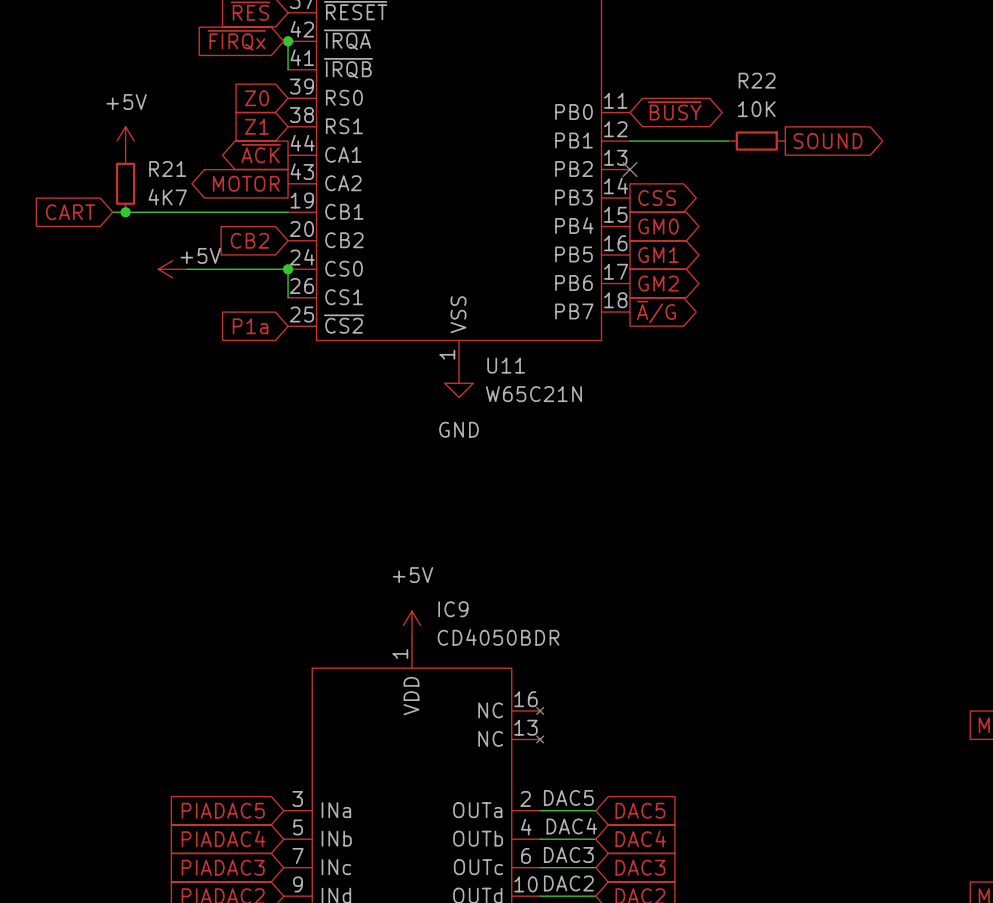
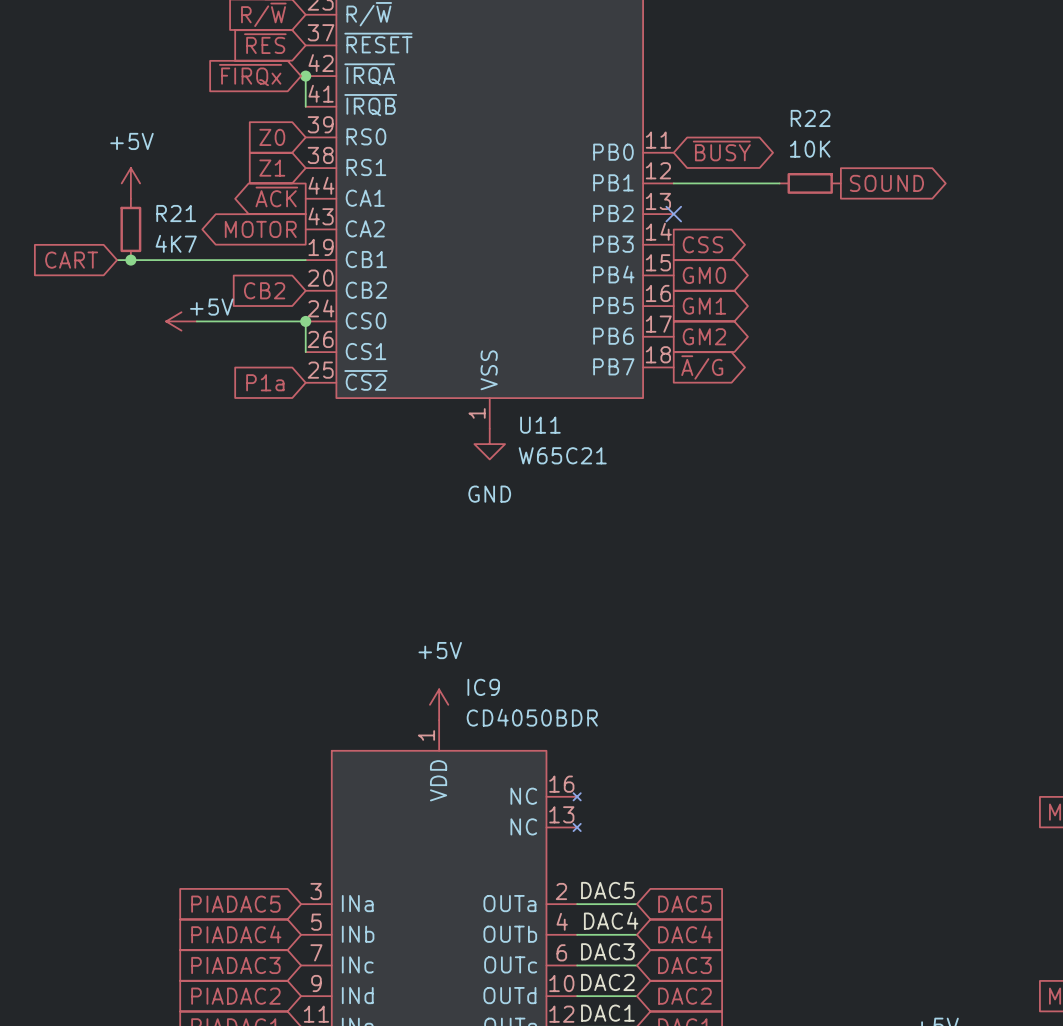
U11 value: W65C21N (533, 394) -> W65C21 (562, 455)

